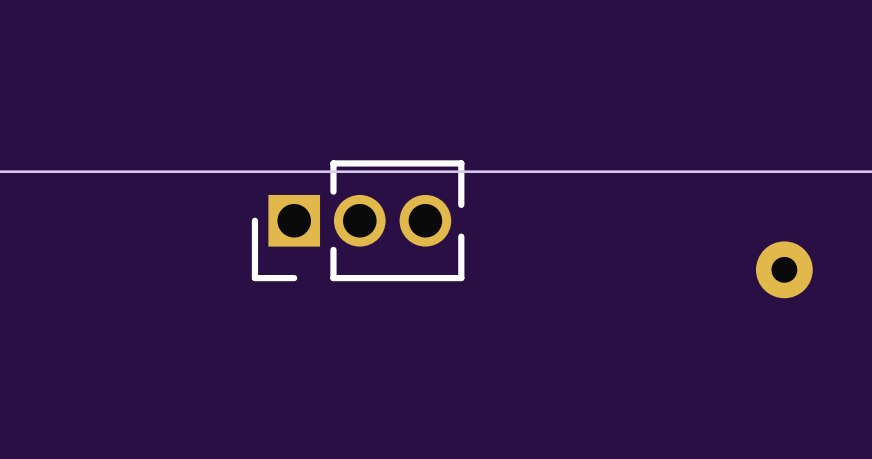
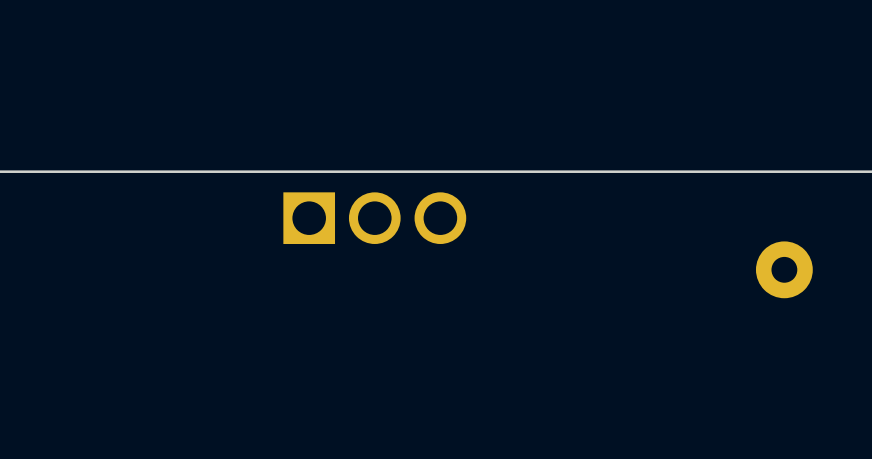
part side: bottom (358, 220) -> top (374, 218)

